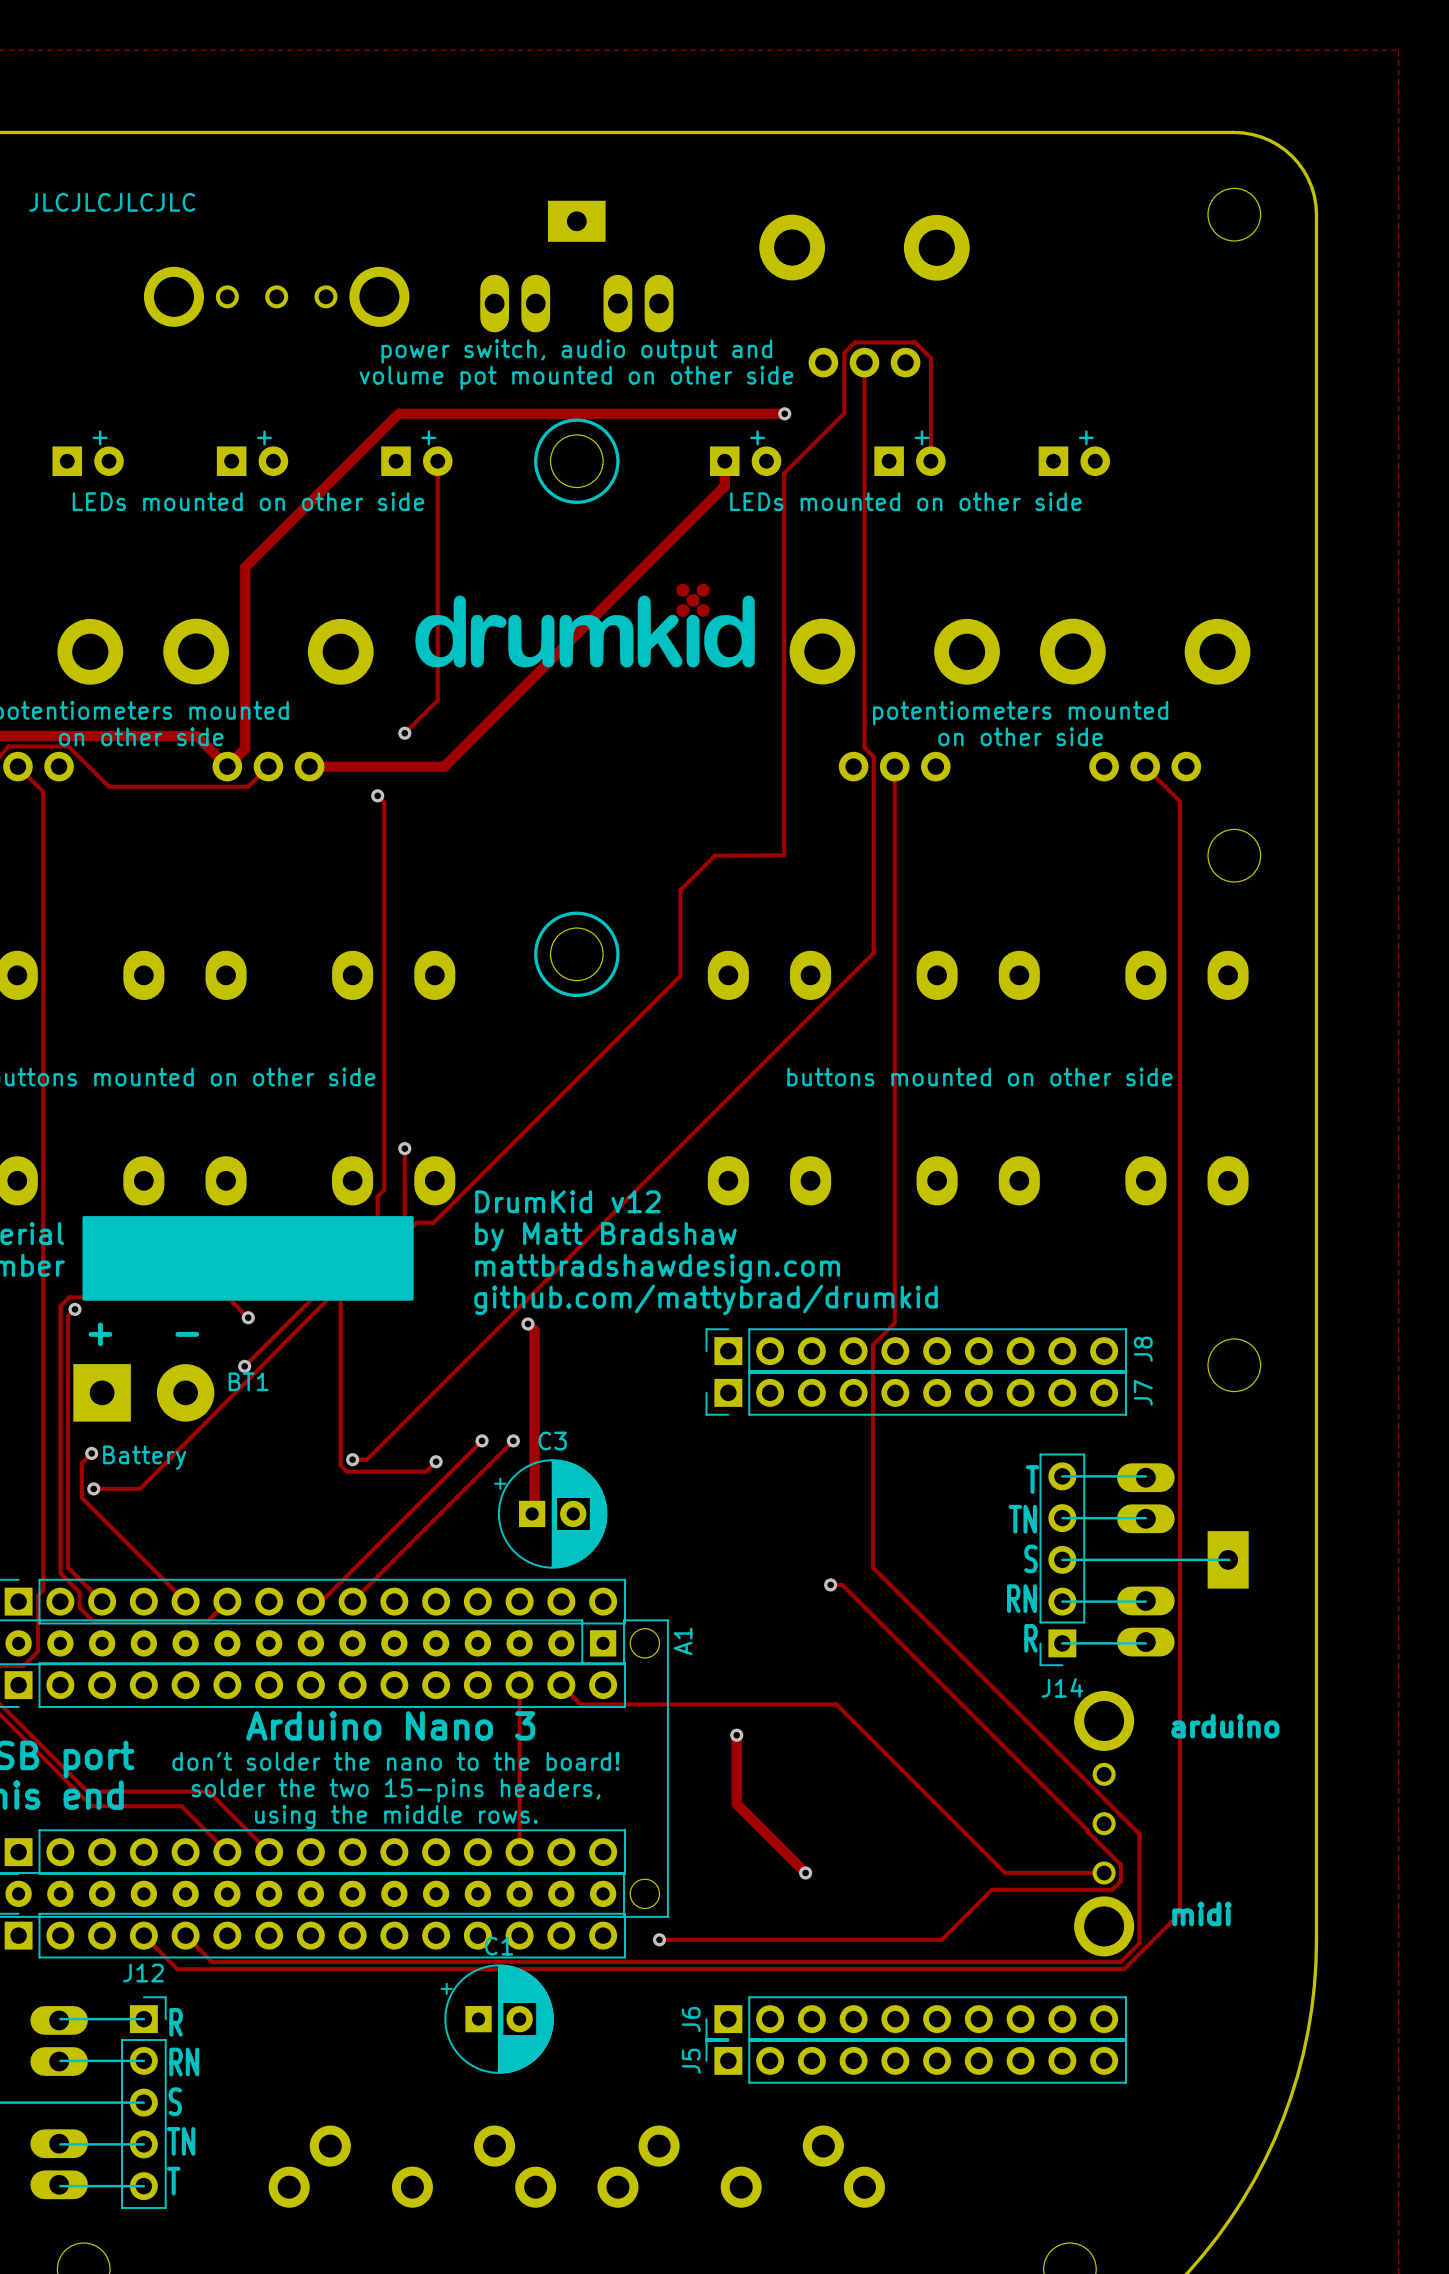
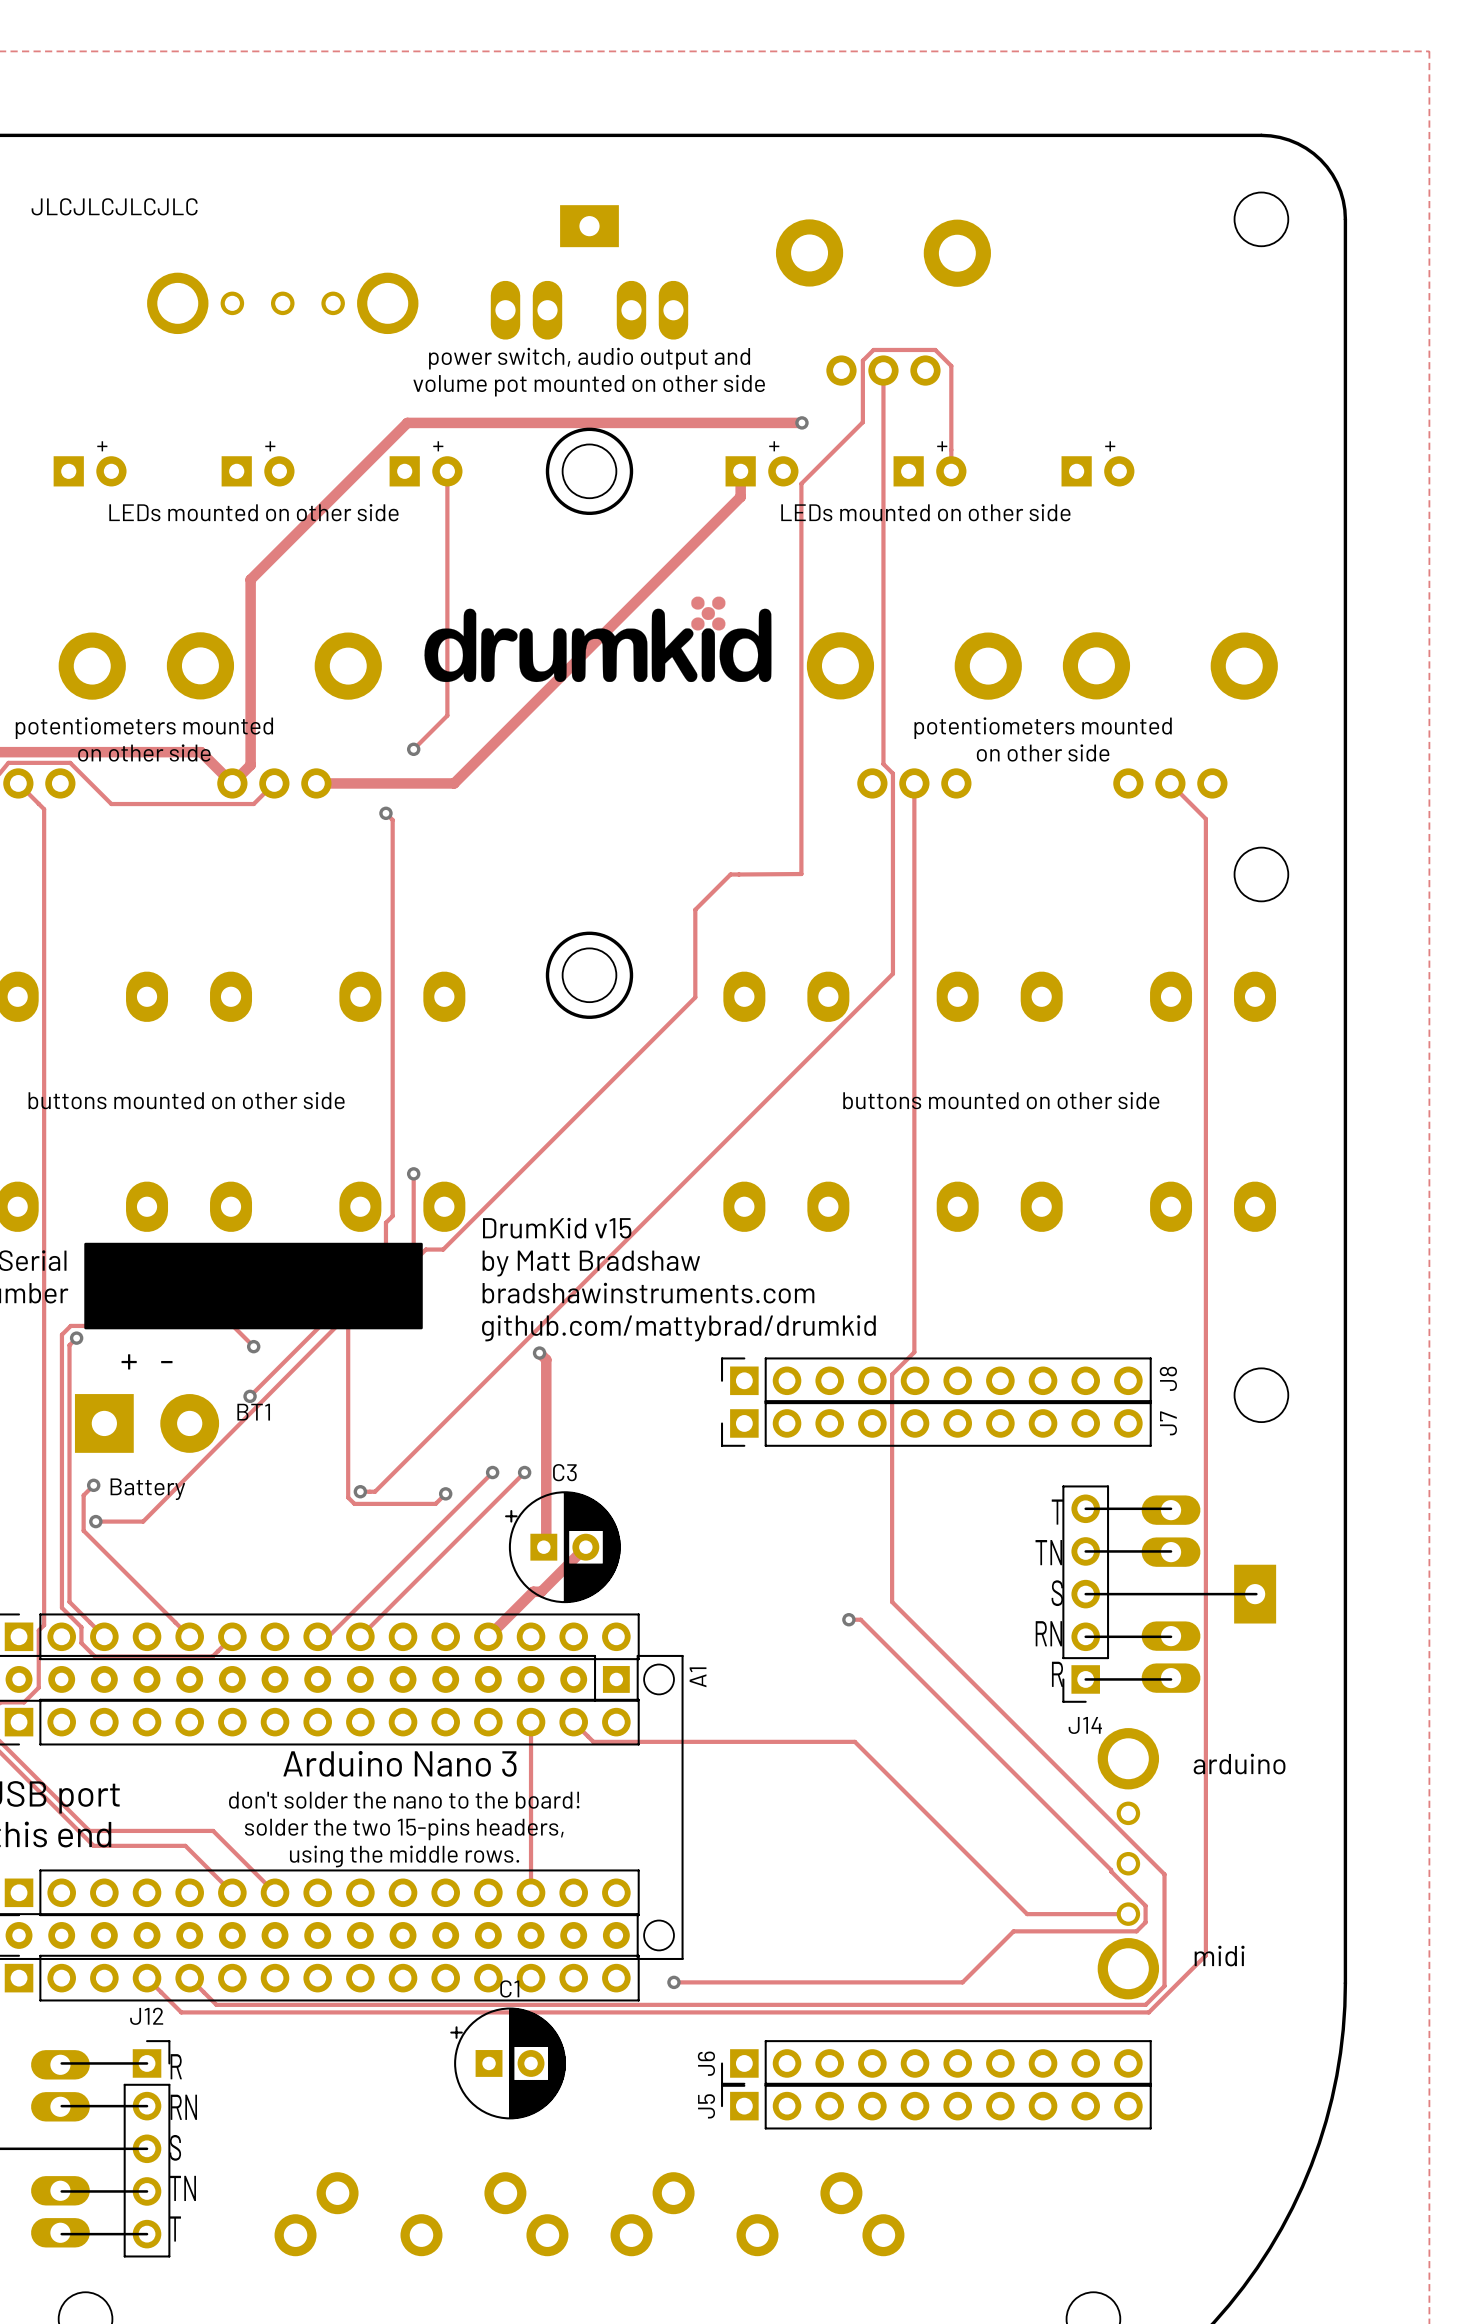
text: DrumKid v12 (567, 1201) -> DrumKid v15 (557, 1228)
text: mattbradshawdesign.com (657, 1268) -> bradshawinstruments.com (648, 1293)
track: none -> (585, 1547) (541, 1591) (533, 1591) (488, 1636)
track: (736, 1735) (736, 1804) (805, 1872) -> none
via: (736, 1735) -> none
via: (805, 1872) -> none

